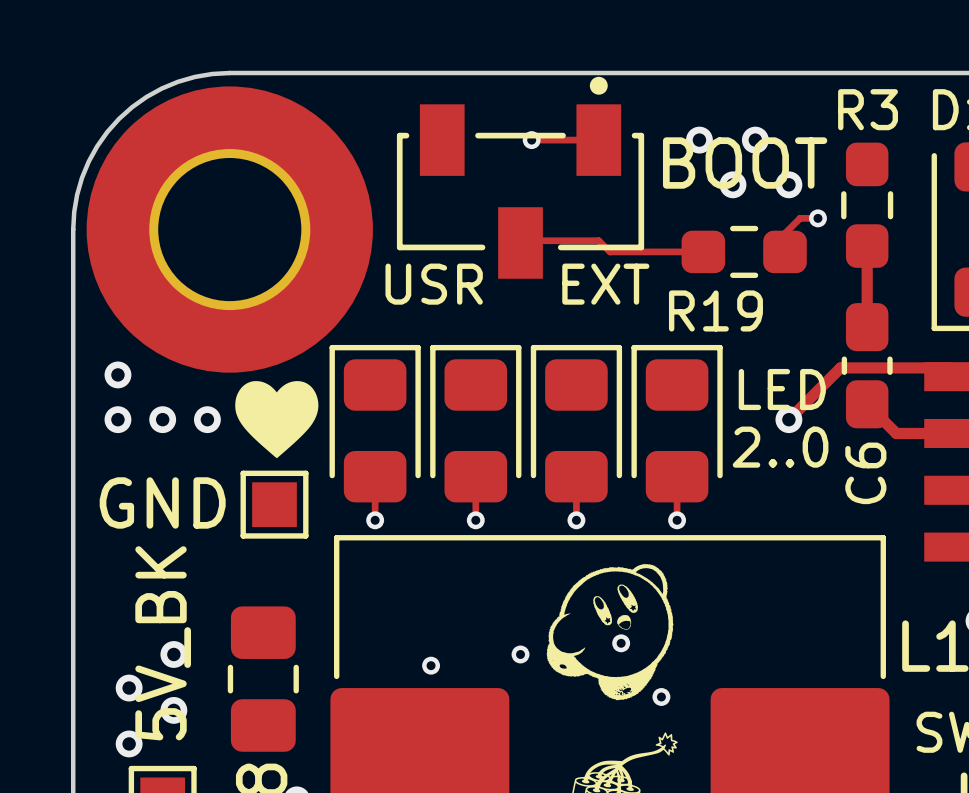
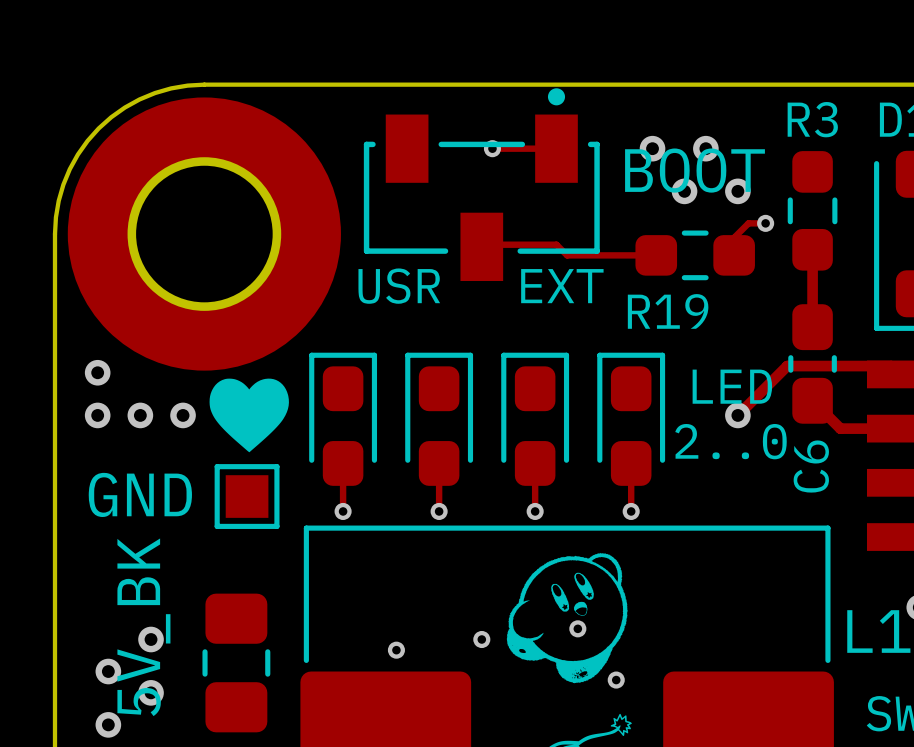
part footprint: [329, 344, 421, 503] -> [309, 352, 378, 486]
part footprint: [430, 344, 522, 503] -> [405, 352, 474, 486]
part footprint: [530, 344, 623, 503] -> [501, 352, 570, 486]
part footprint: [631, 344, 723, 503] -> [597, 352, 666, 486]

